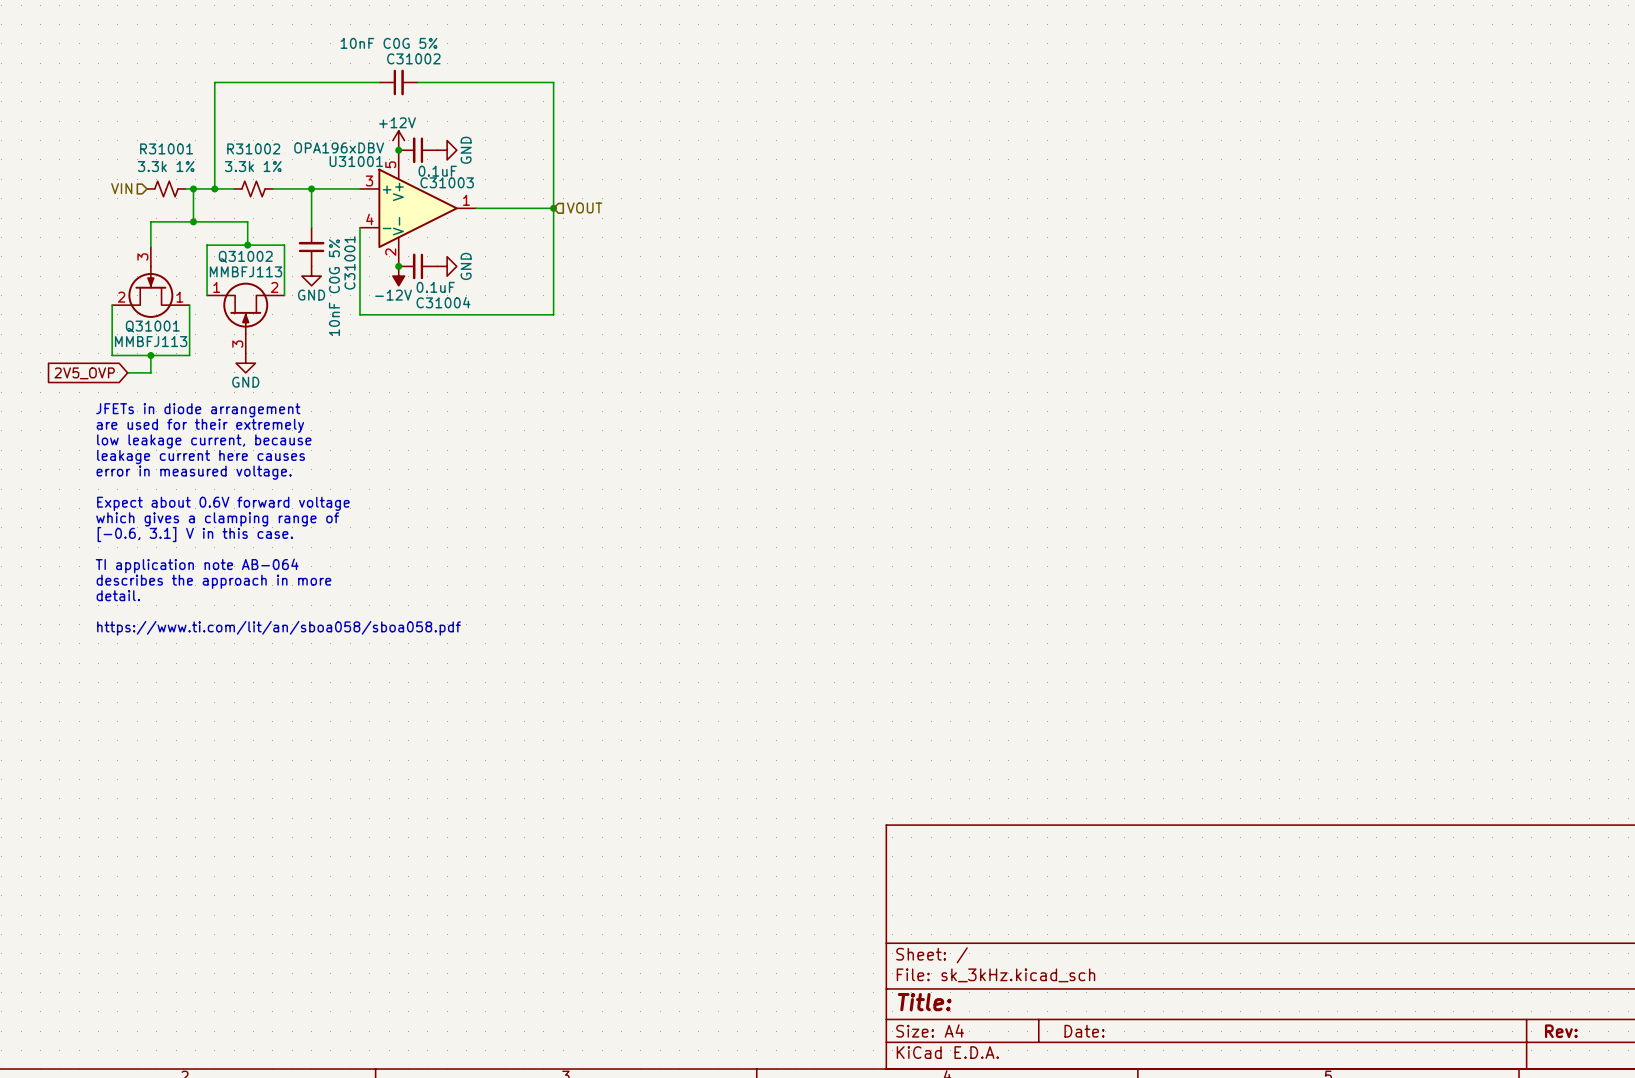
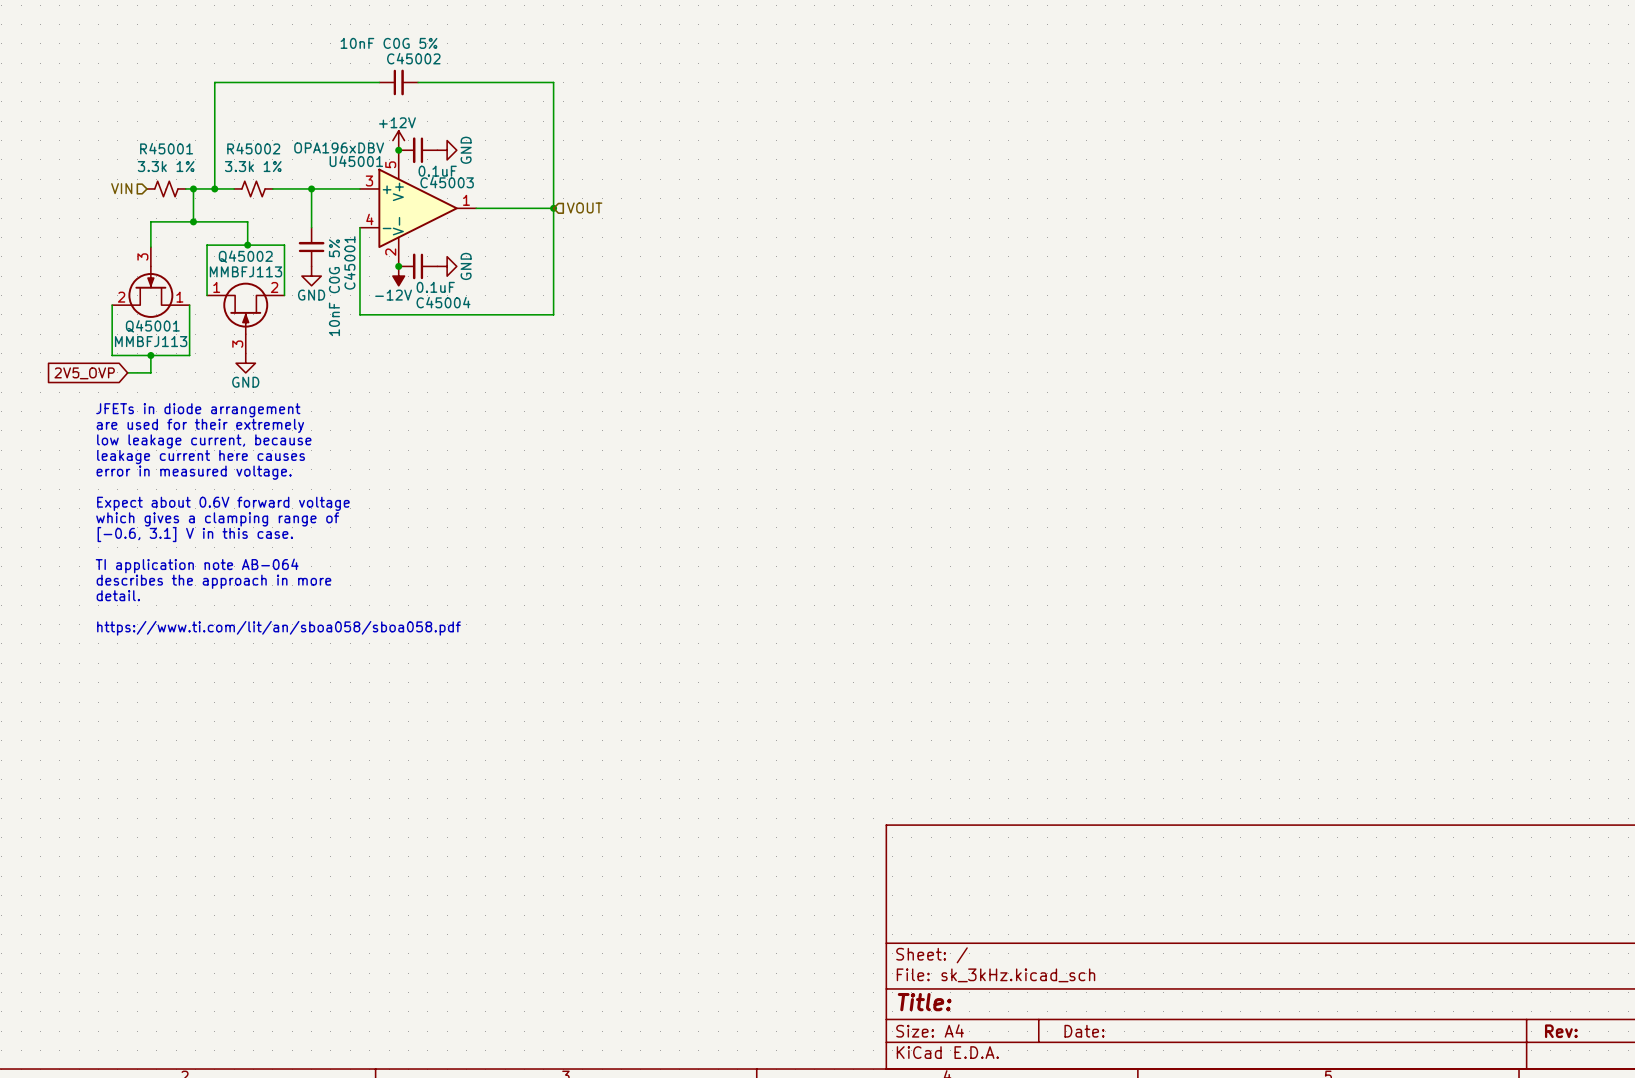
C31002 name: C31002 (413, 58) -> C45002 (413, 58)
R31001 name: R31001 (166, 148) -> R45001 (166, 148)
R31002 name: R31002 (253, 148) -> R45002 (253, 148)
U31001 name: U31001 (356, 161) -> U45001 (356, 161)
C31003 name: C31003 (447, 182) -> C45003 (447, 182)
Q31002 name: Q31002 (245, 256) -> Q45002 (245, 256)
C31001 name: C31001 (349, 262) -> C45001 (349, 262)
C31004 name: C31004 (443, 302) -> C45004 (443, 302)
Q31001 name: Q31001 (152, 326) -> Q45001 (152, 326)

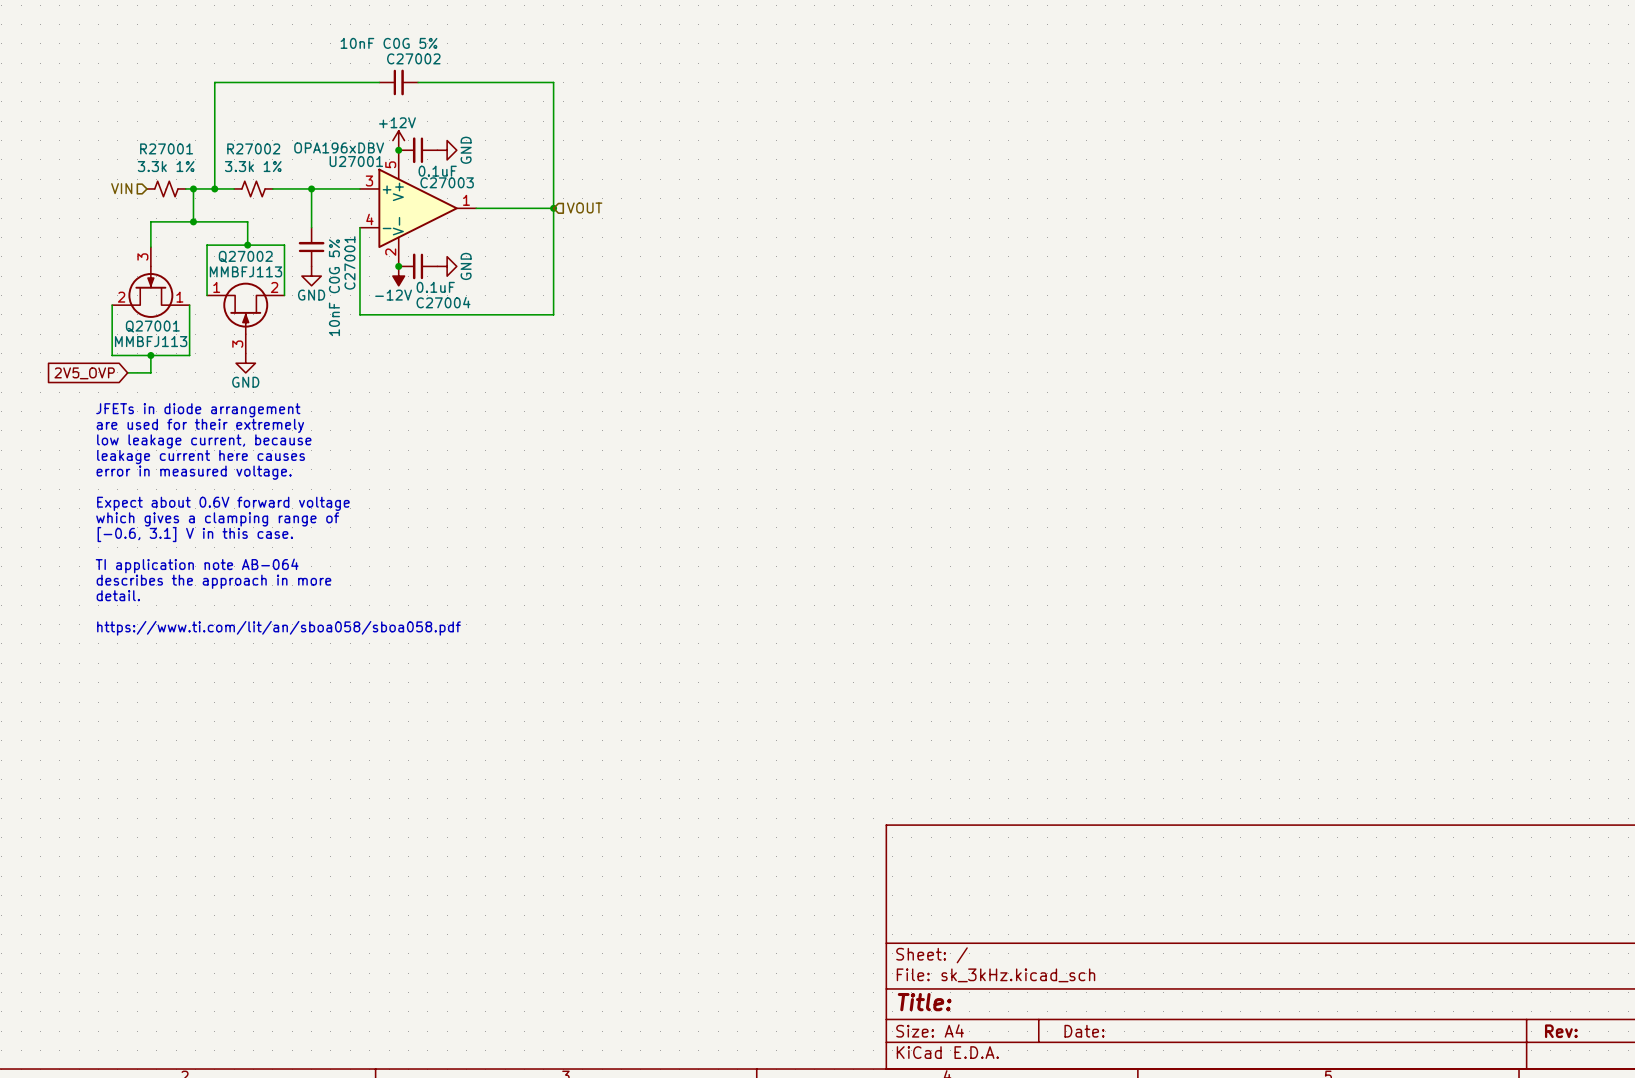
C45002 name: C45002 (413, 58) -> C27002 (413, 58)
R45001 name: R45001 (166, 148) -> R27001 (166, 148)
R45002 name: R45002 (253, 148) -> R27002 (253, 148)
U45001 name: U45001 (356, 161) -> U27001 (356, 161)
C45003 name: C45003 (447, 182) -> C27003 (447, 182)
Q45002 name: Q45002 (245, 256) -> Q27002 (245, 256)
C45001 name: C45001 (349, 262) -> C27001 (349, 262)
C45004 name: C45004 (443, 302) -> C27004 (443, 302)
Q45001 name: Q45001 (152, 326) -> Q27001 (152, 326)

